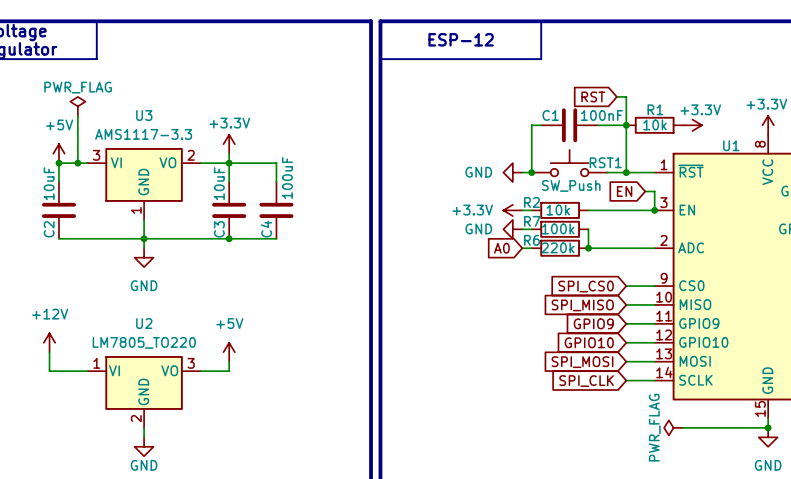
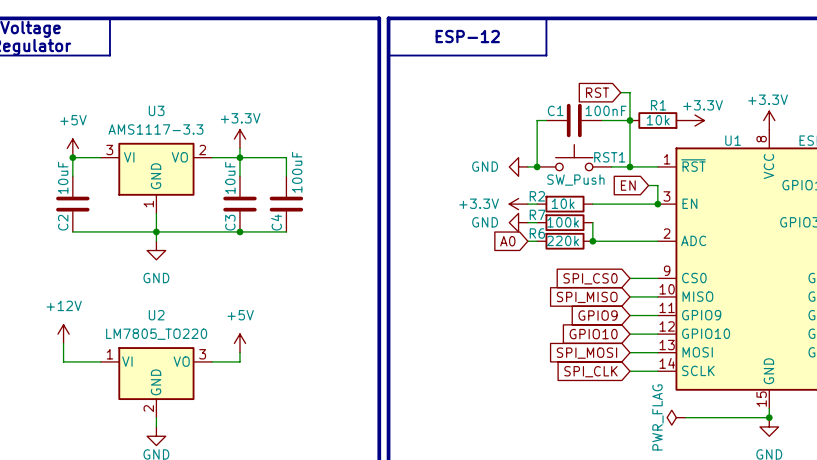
power symbol: PWR_FLAG (77, 106) -> none
wire: (77, 115) (77, 163) -> none
junction: (77, 163) -> none

